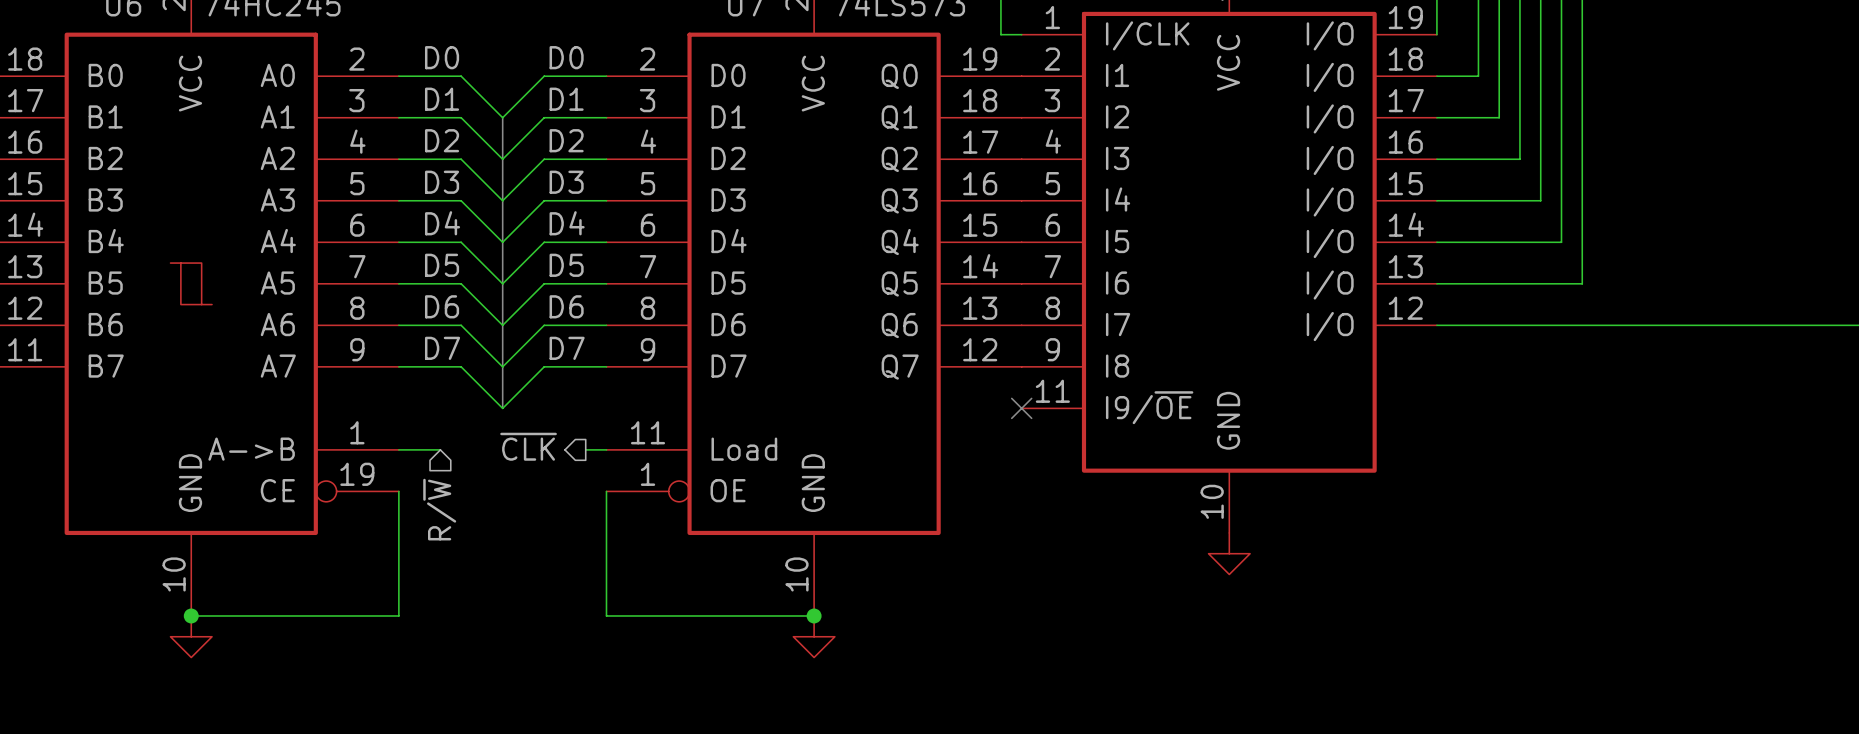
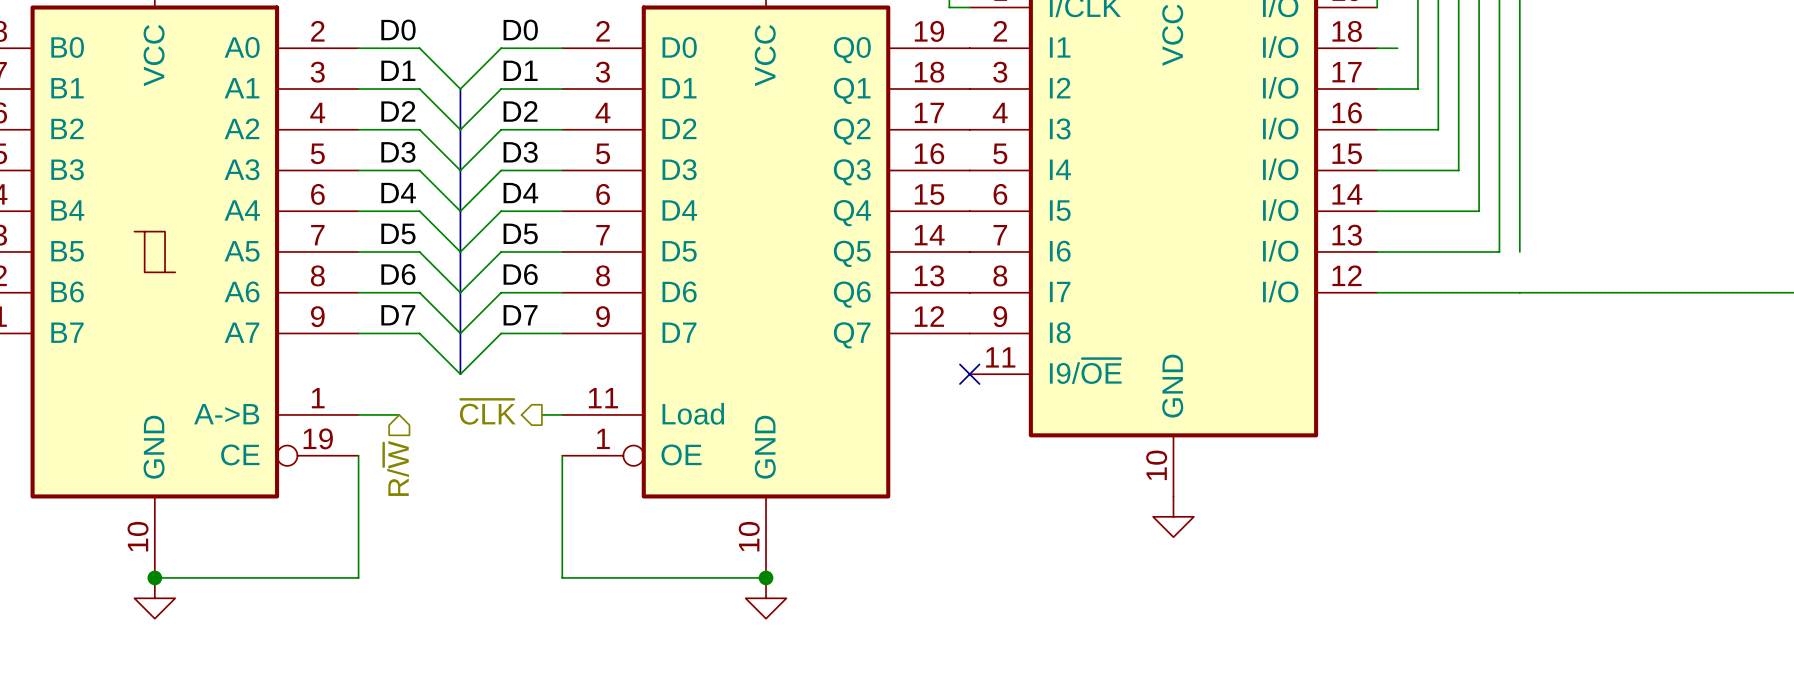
wire: (1457, 76) (1478, 76) -> (1417, 88) (1417, 48)
wire: (1478, 117) (1499, 117) -> none
wire: (1499, 159) (1519, 159) -> (1438, 129) (1438, 88)
wire: none -> (1458, 129) (1458, 170)
wire: (1519, 200) (1540, 200) -> (1479, 211) (1479, 170)
wire: (1540, 242) (1561, 242) -> none
wire: (1561, 283) (1582, 283) -> (1499, 251) (1499, 211)

